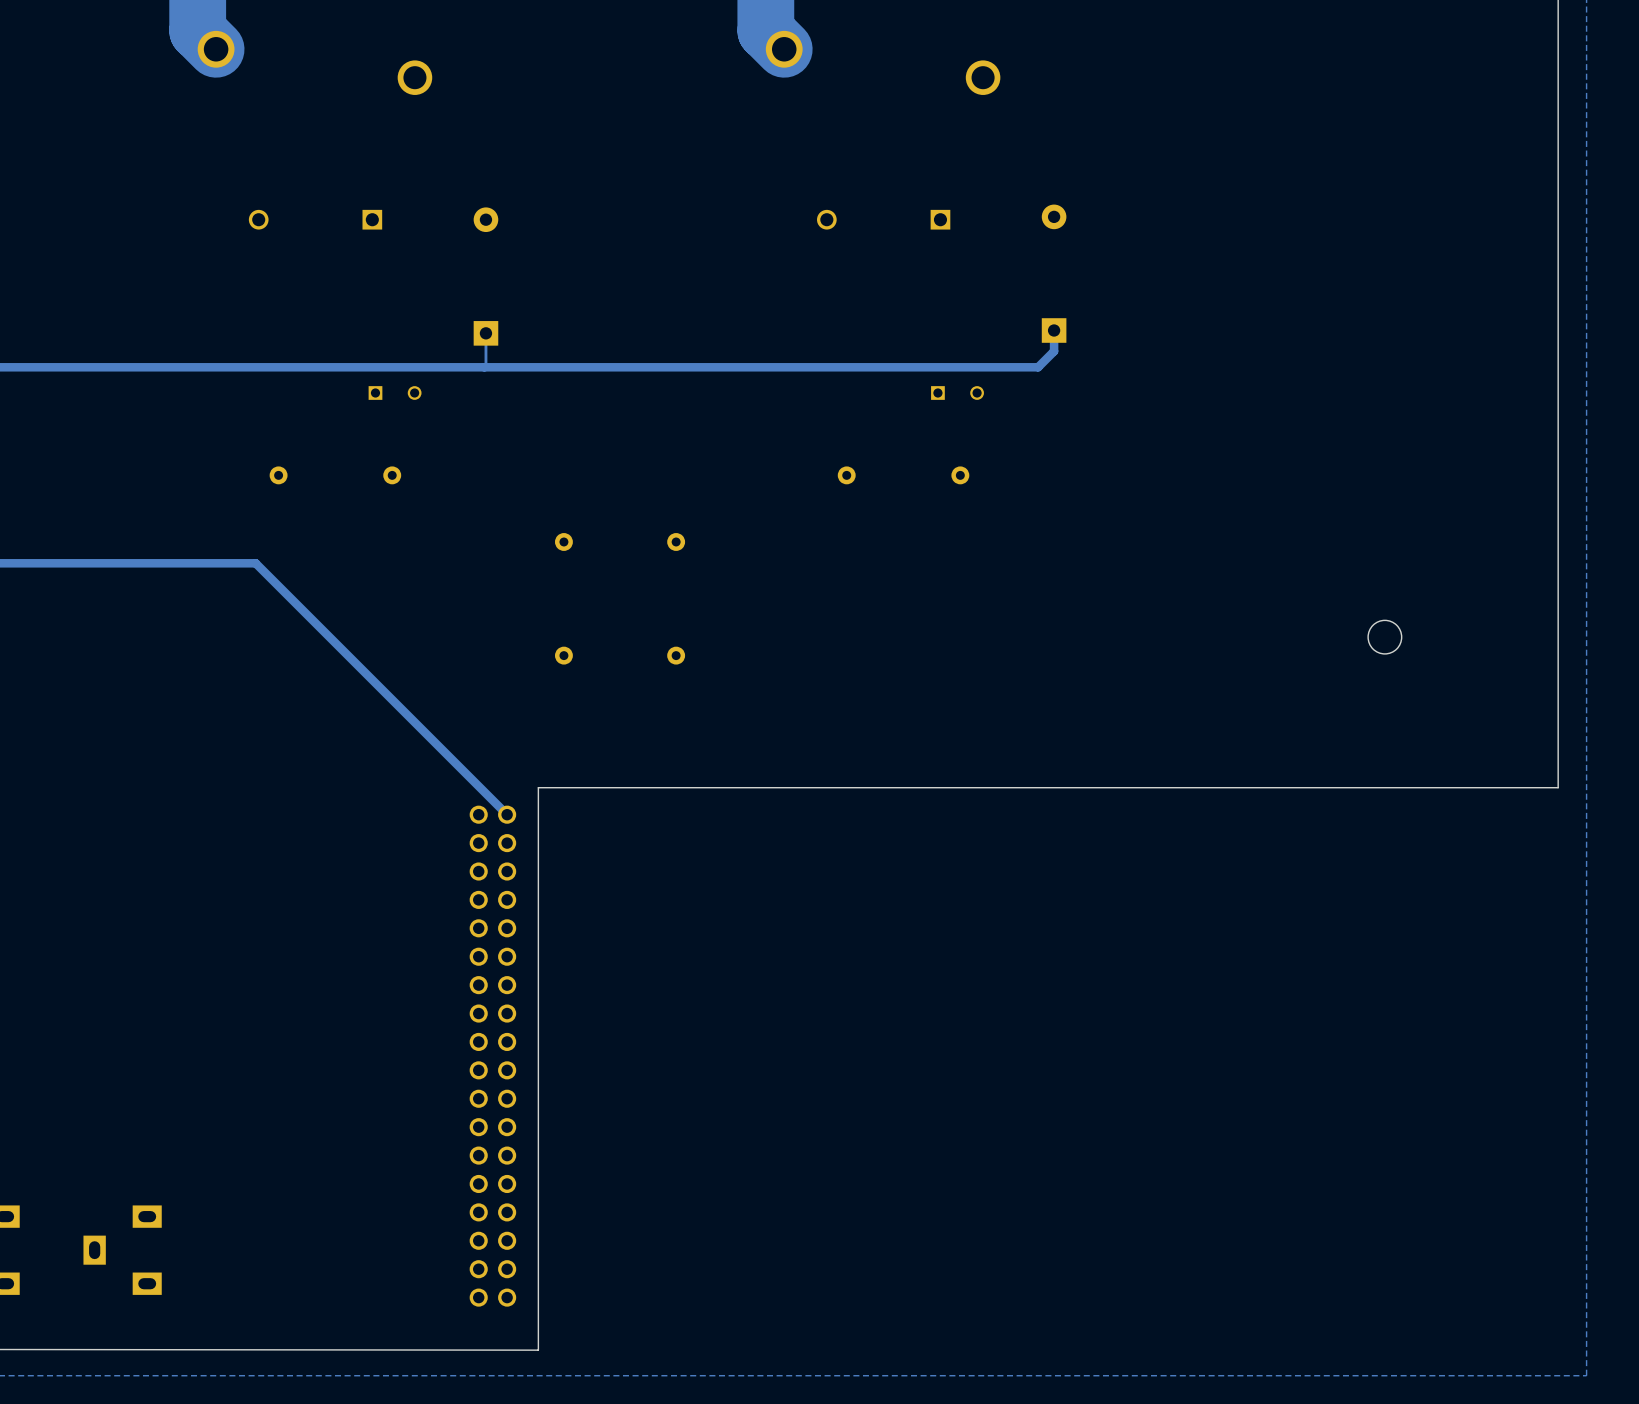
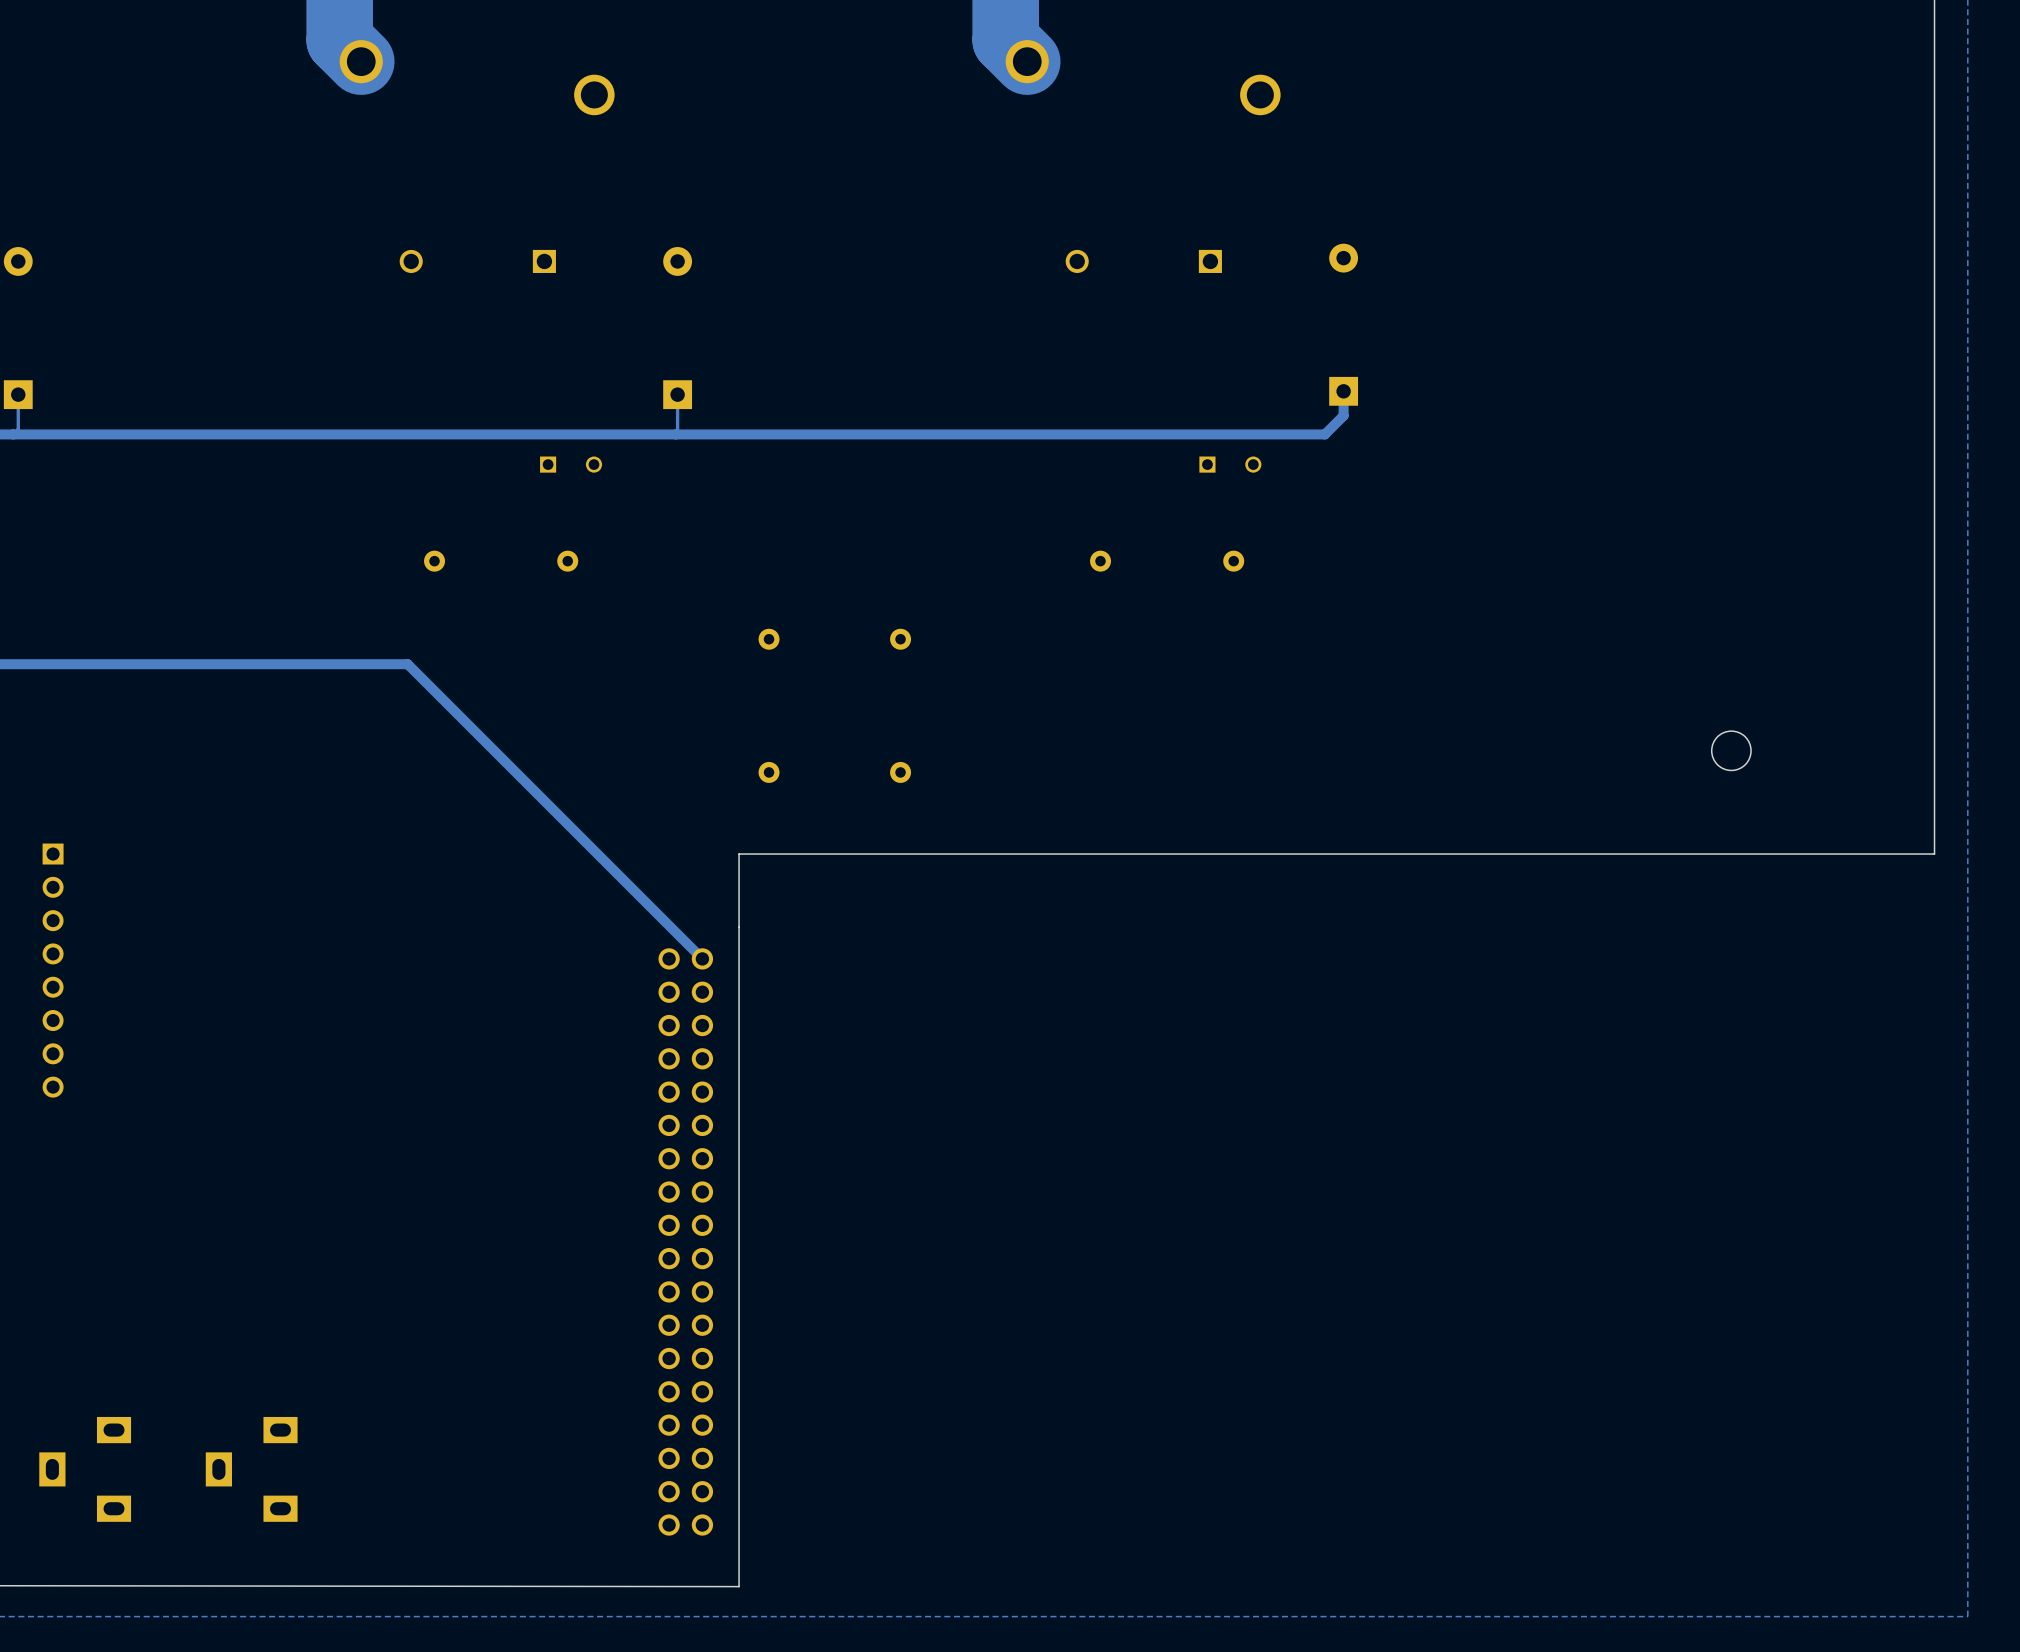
board edge: (1558, 725) (1558, 787) (538, 787) -> (1934, 854) (739, 854) (739, 927)

